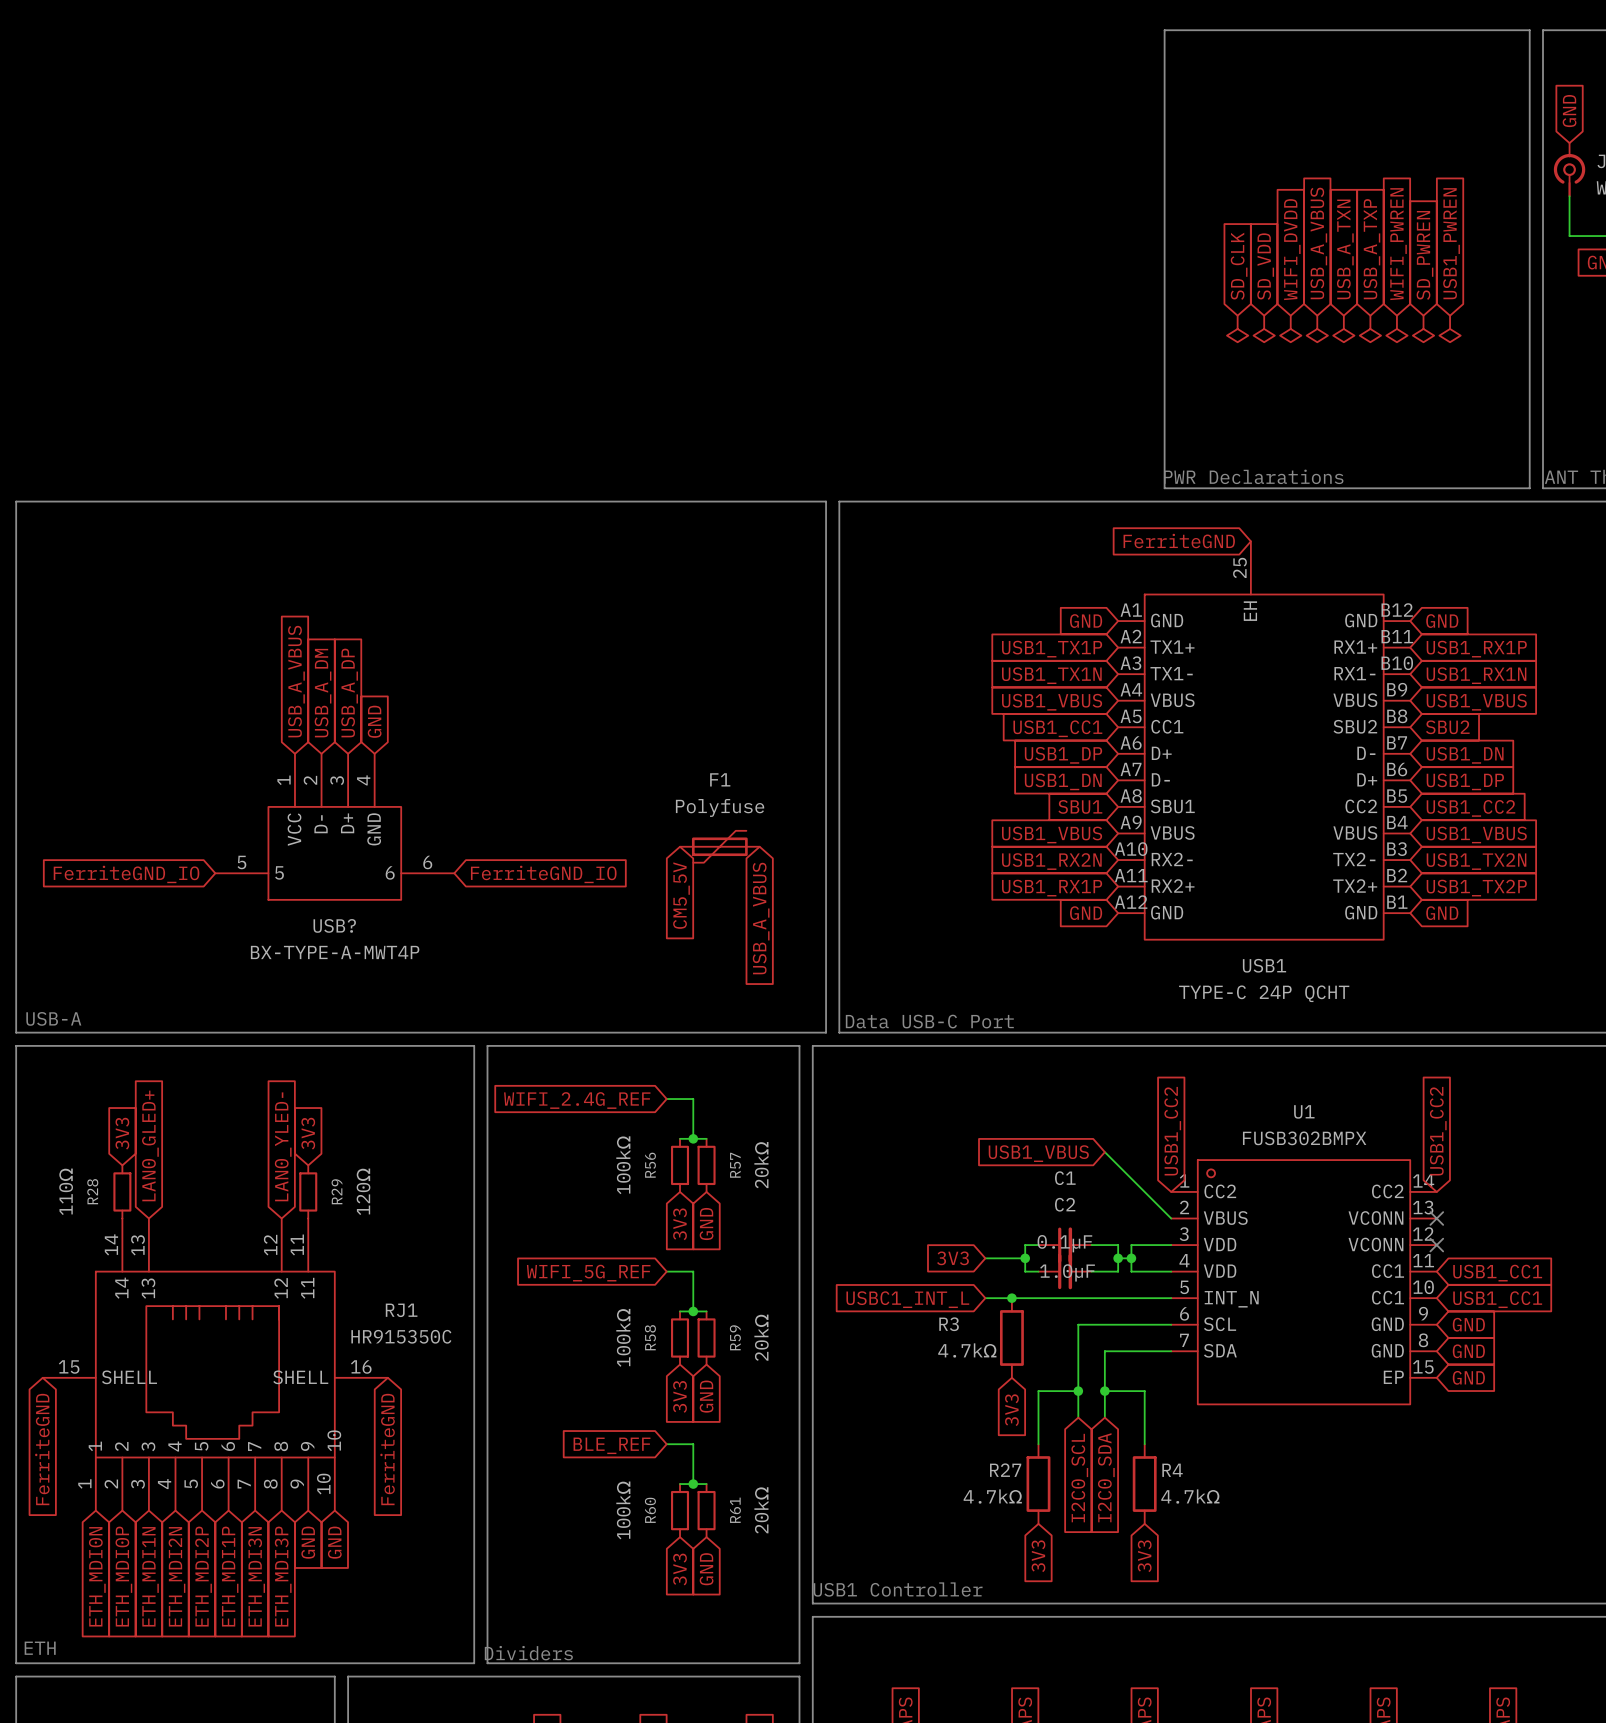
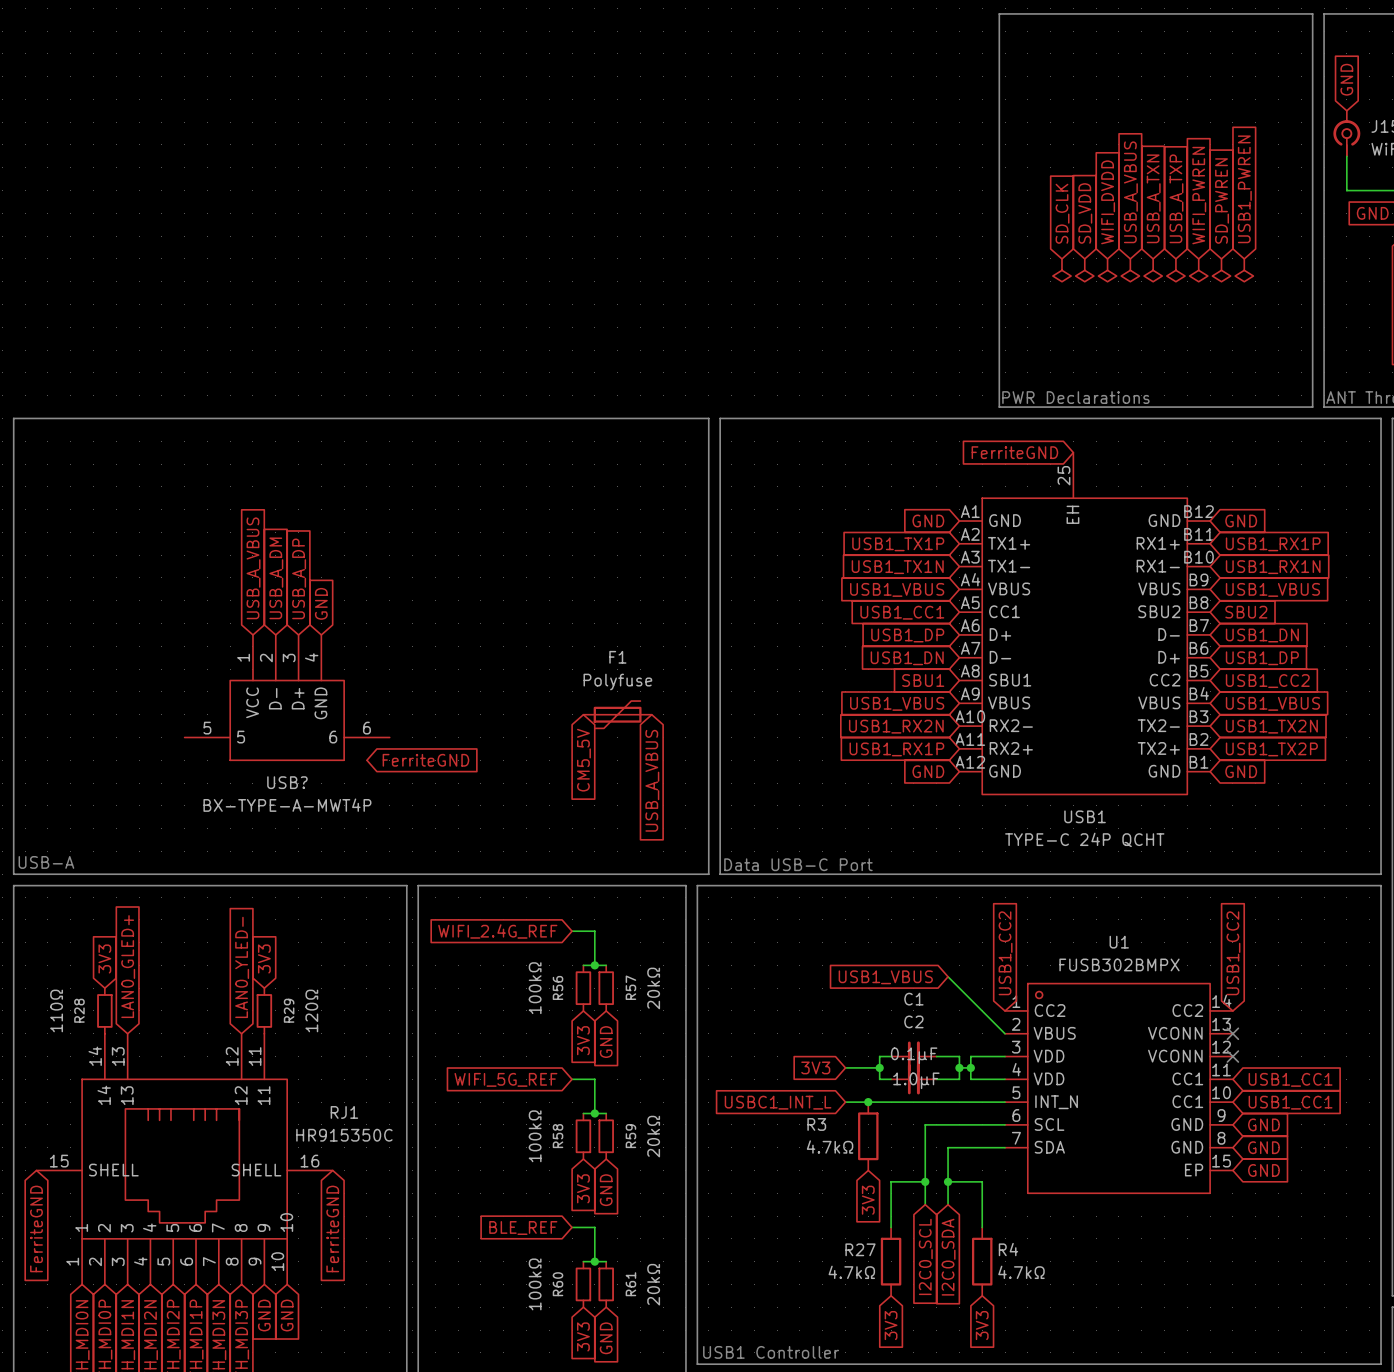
global label: FerriteGND_IO (126, 874) -> none
global label: FerriteGND_IO (543, 874) -> FerriteGND (425, 760)

